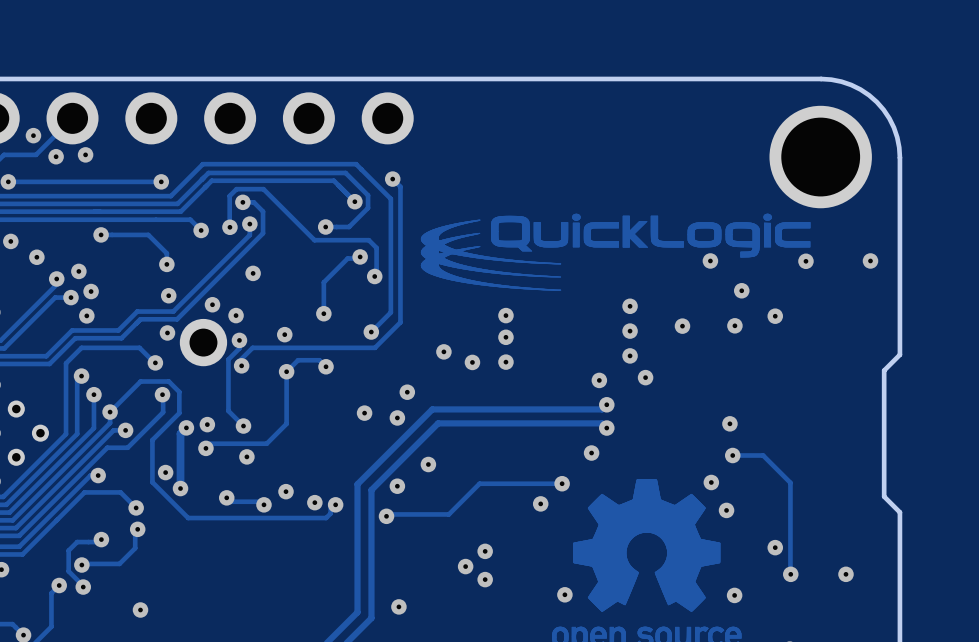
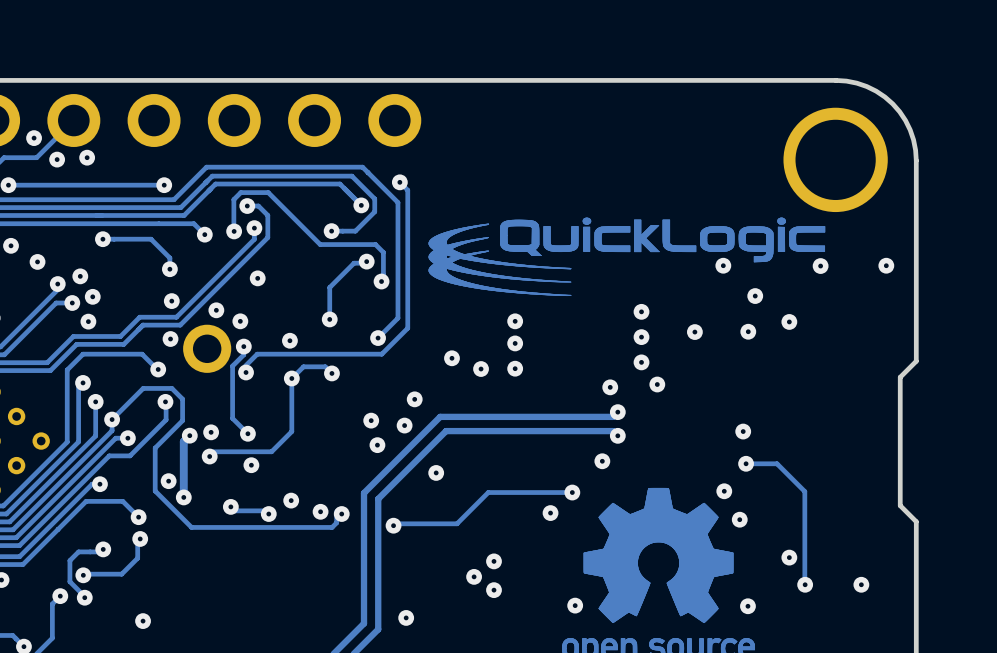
via position: (397, 486) -> (377, 445)

